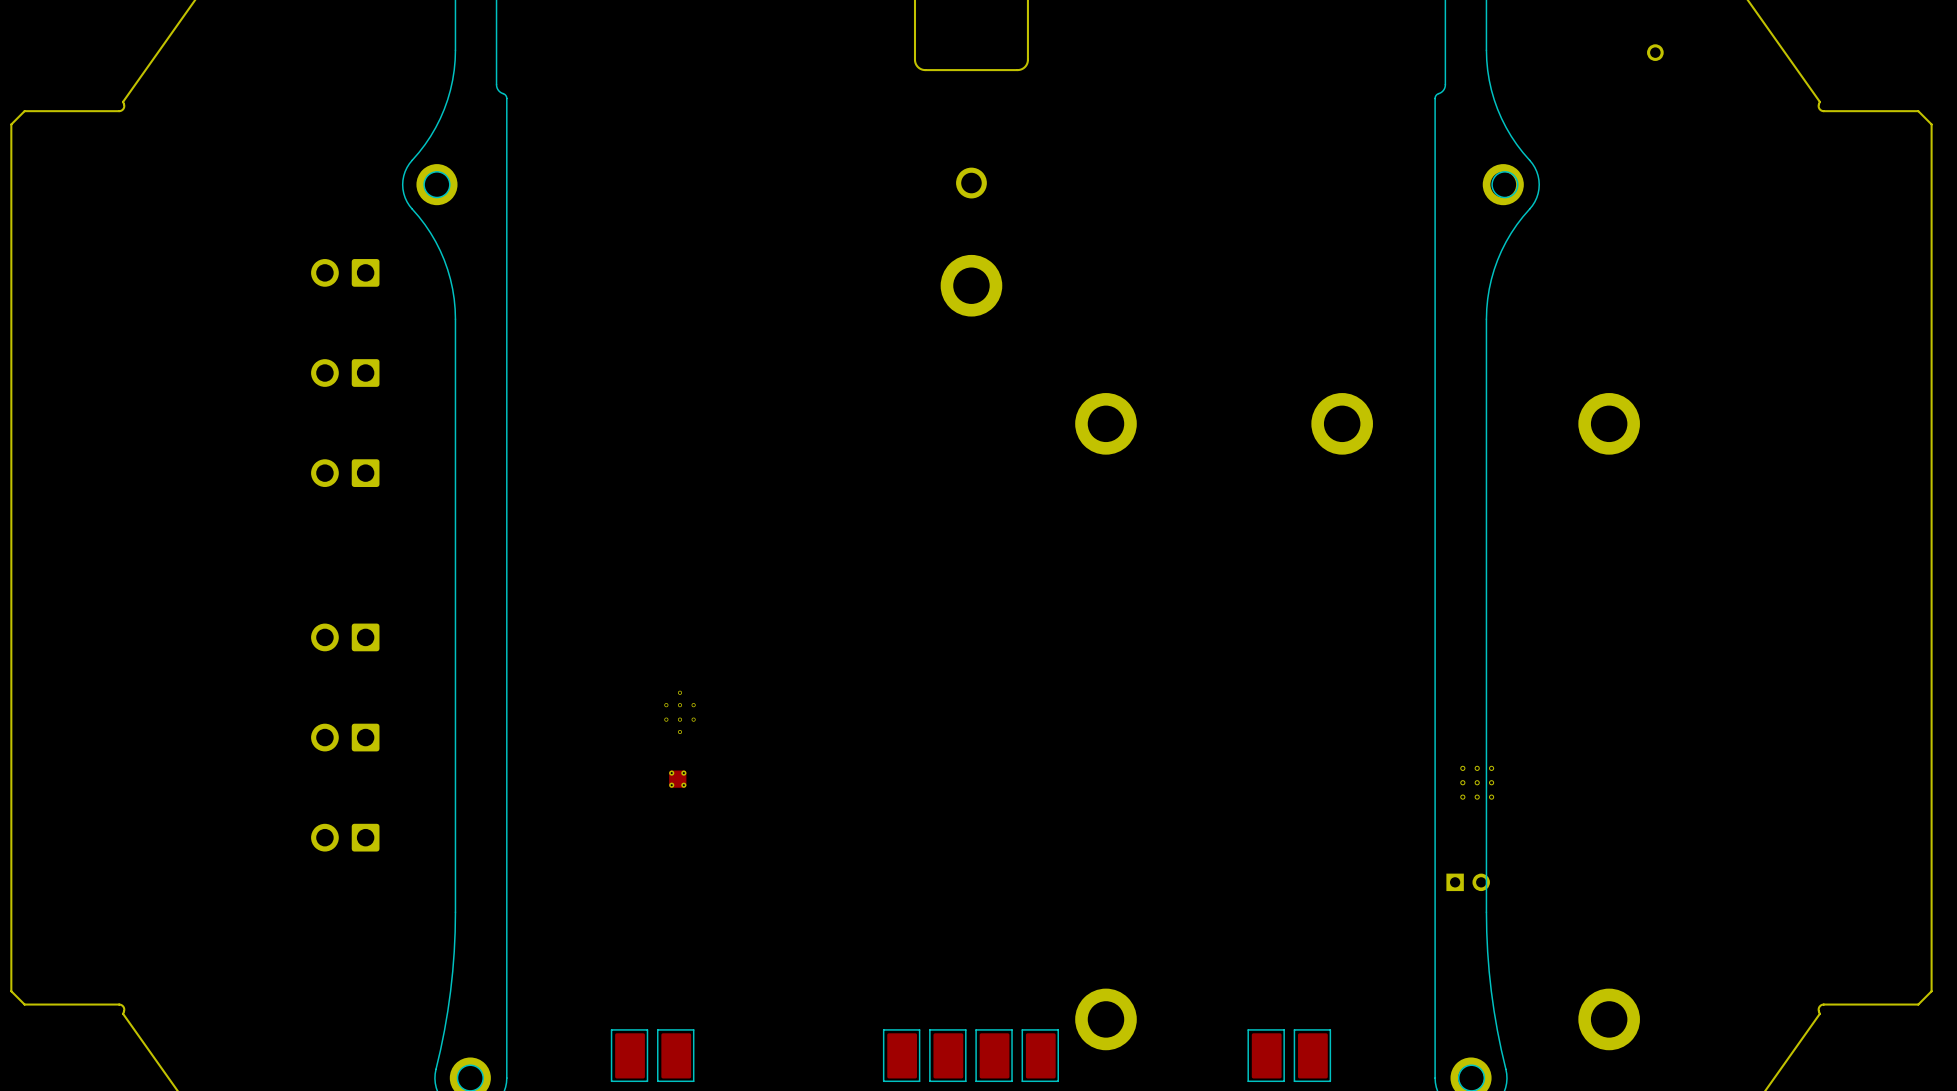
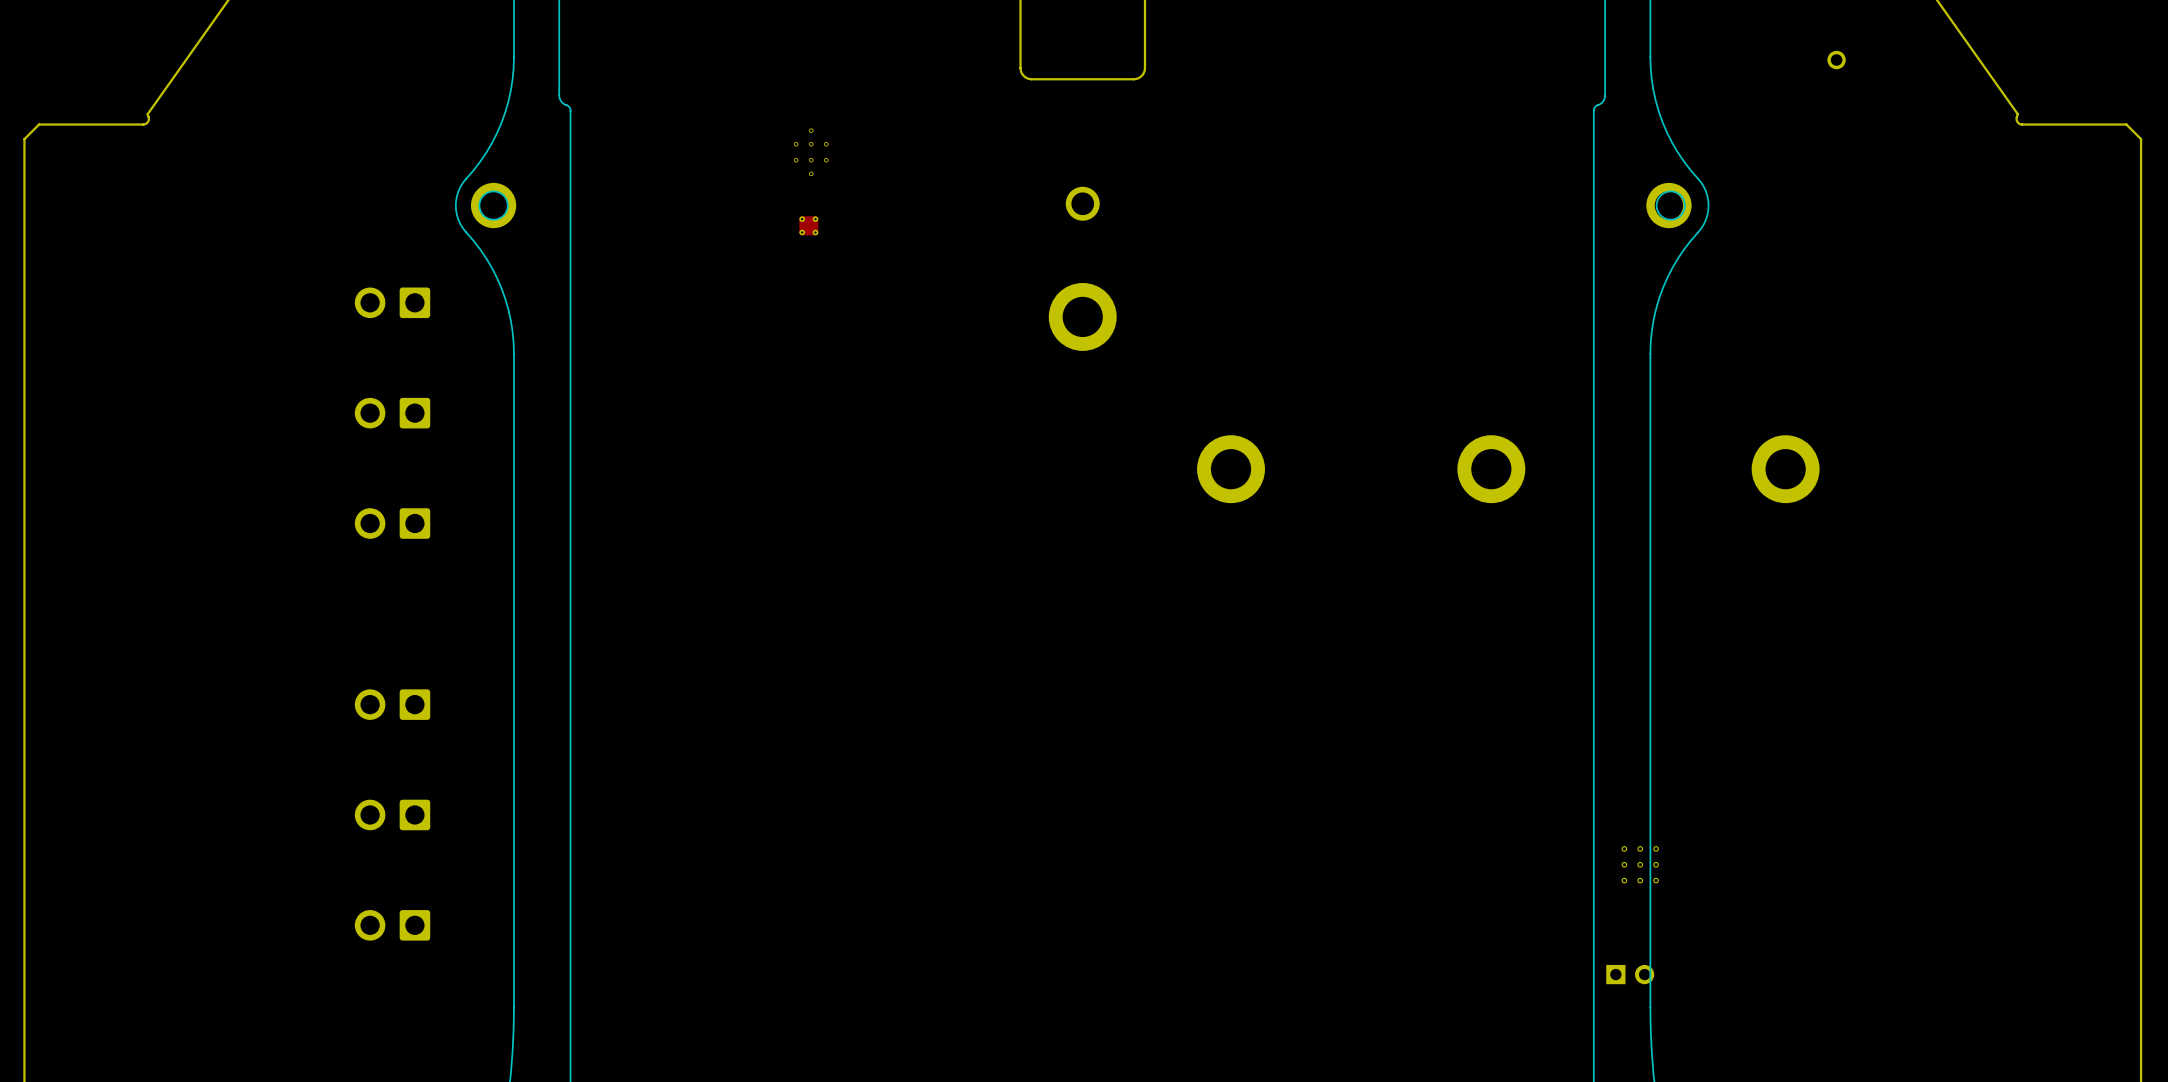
part: none -> (811, 152)
part: none -> (808, 225)
part: (679, 712) -> none
part: (677, 779) -> none

